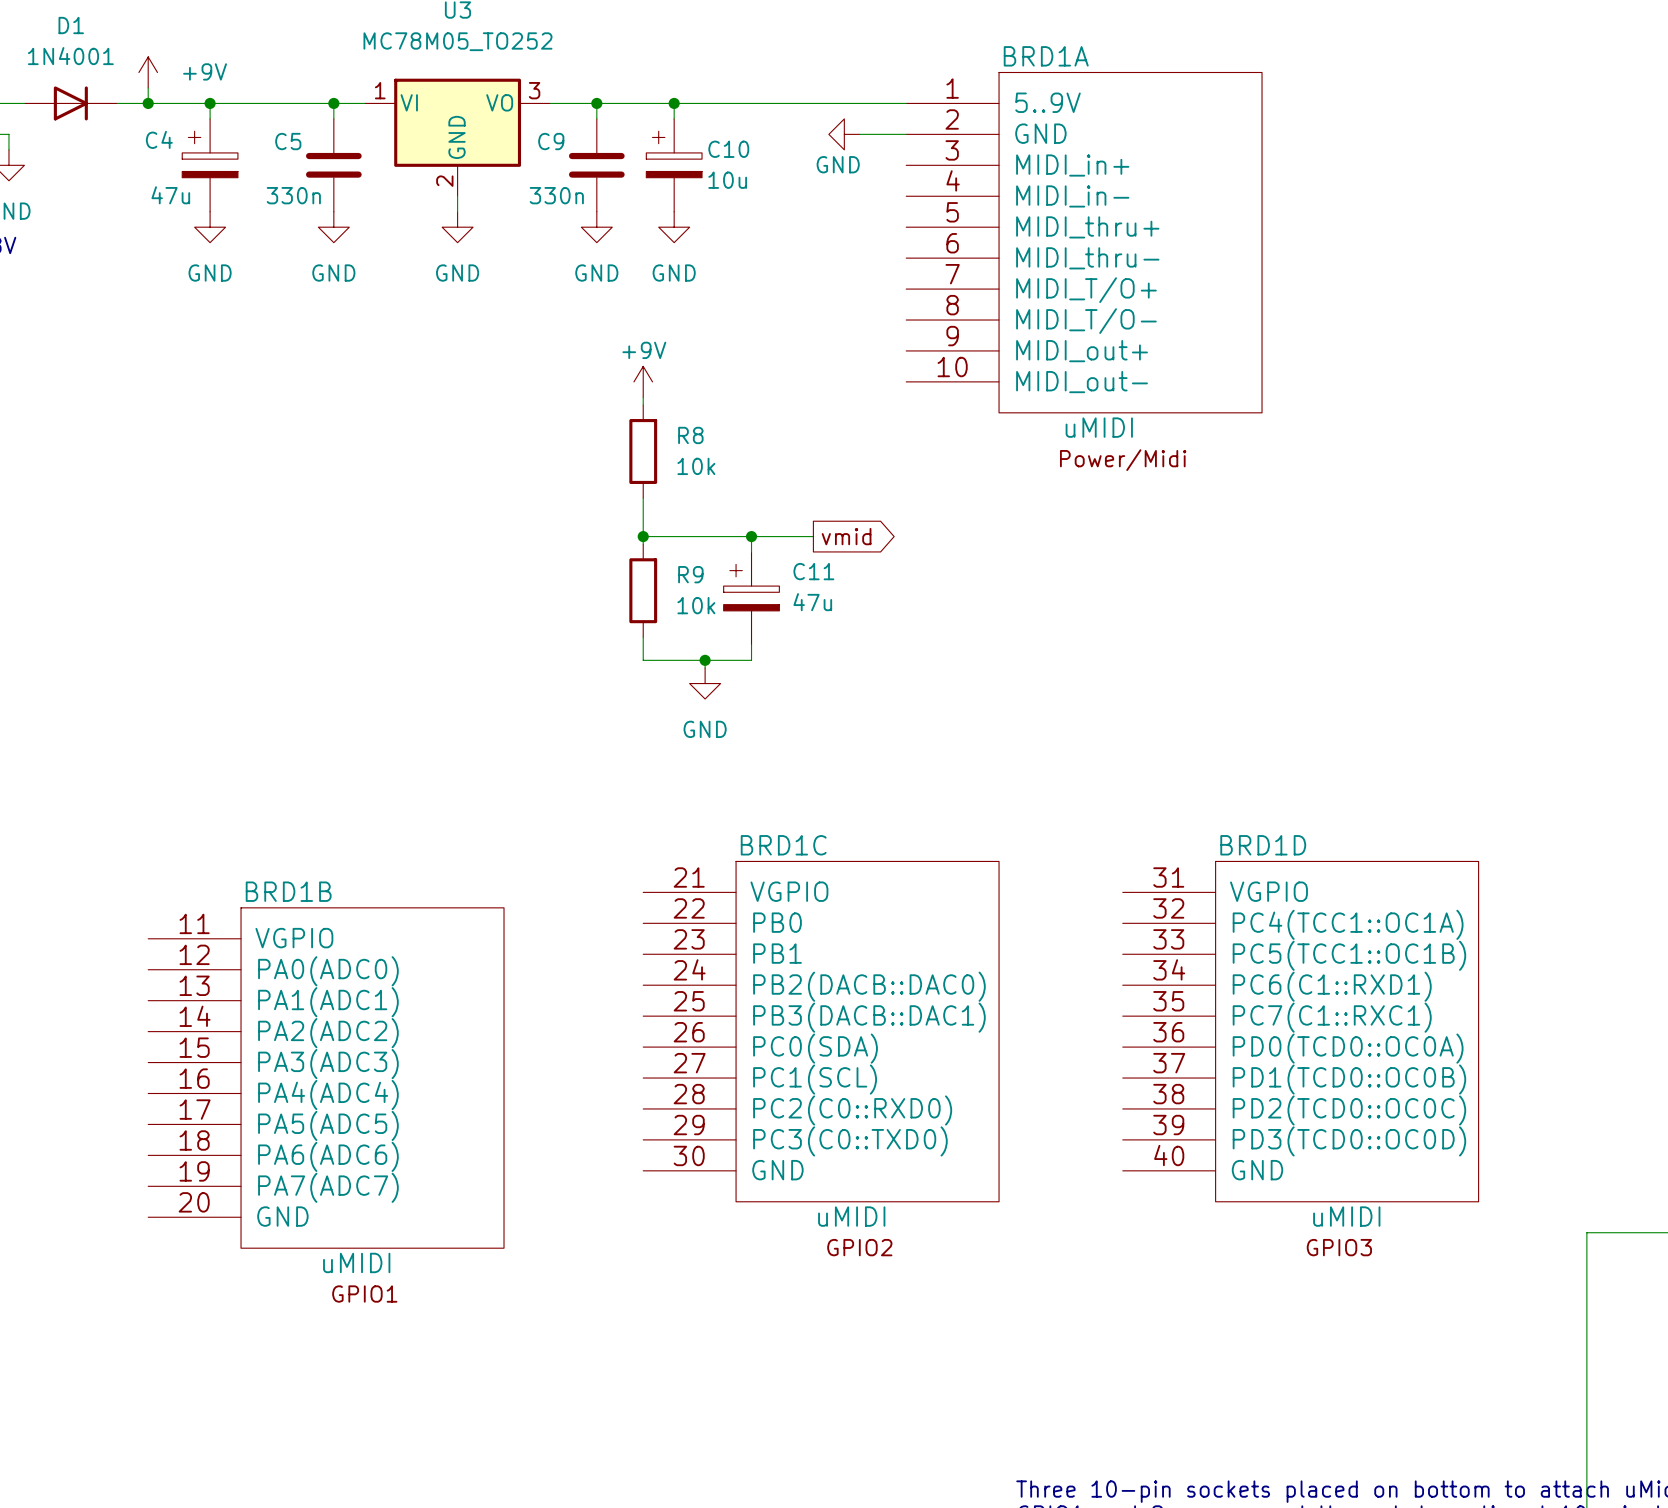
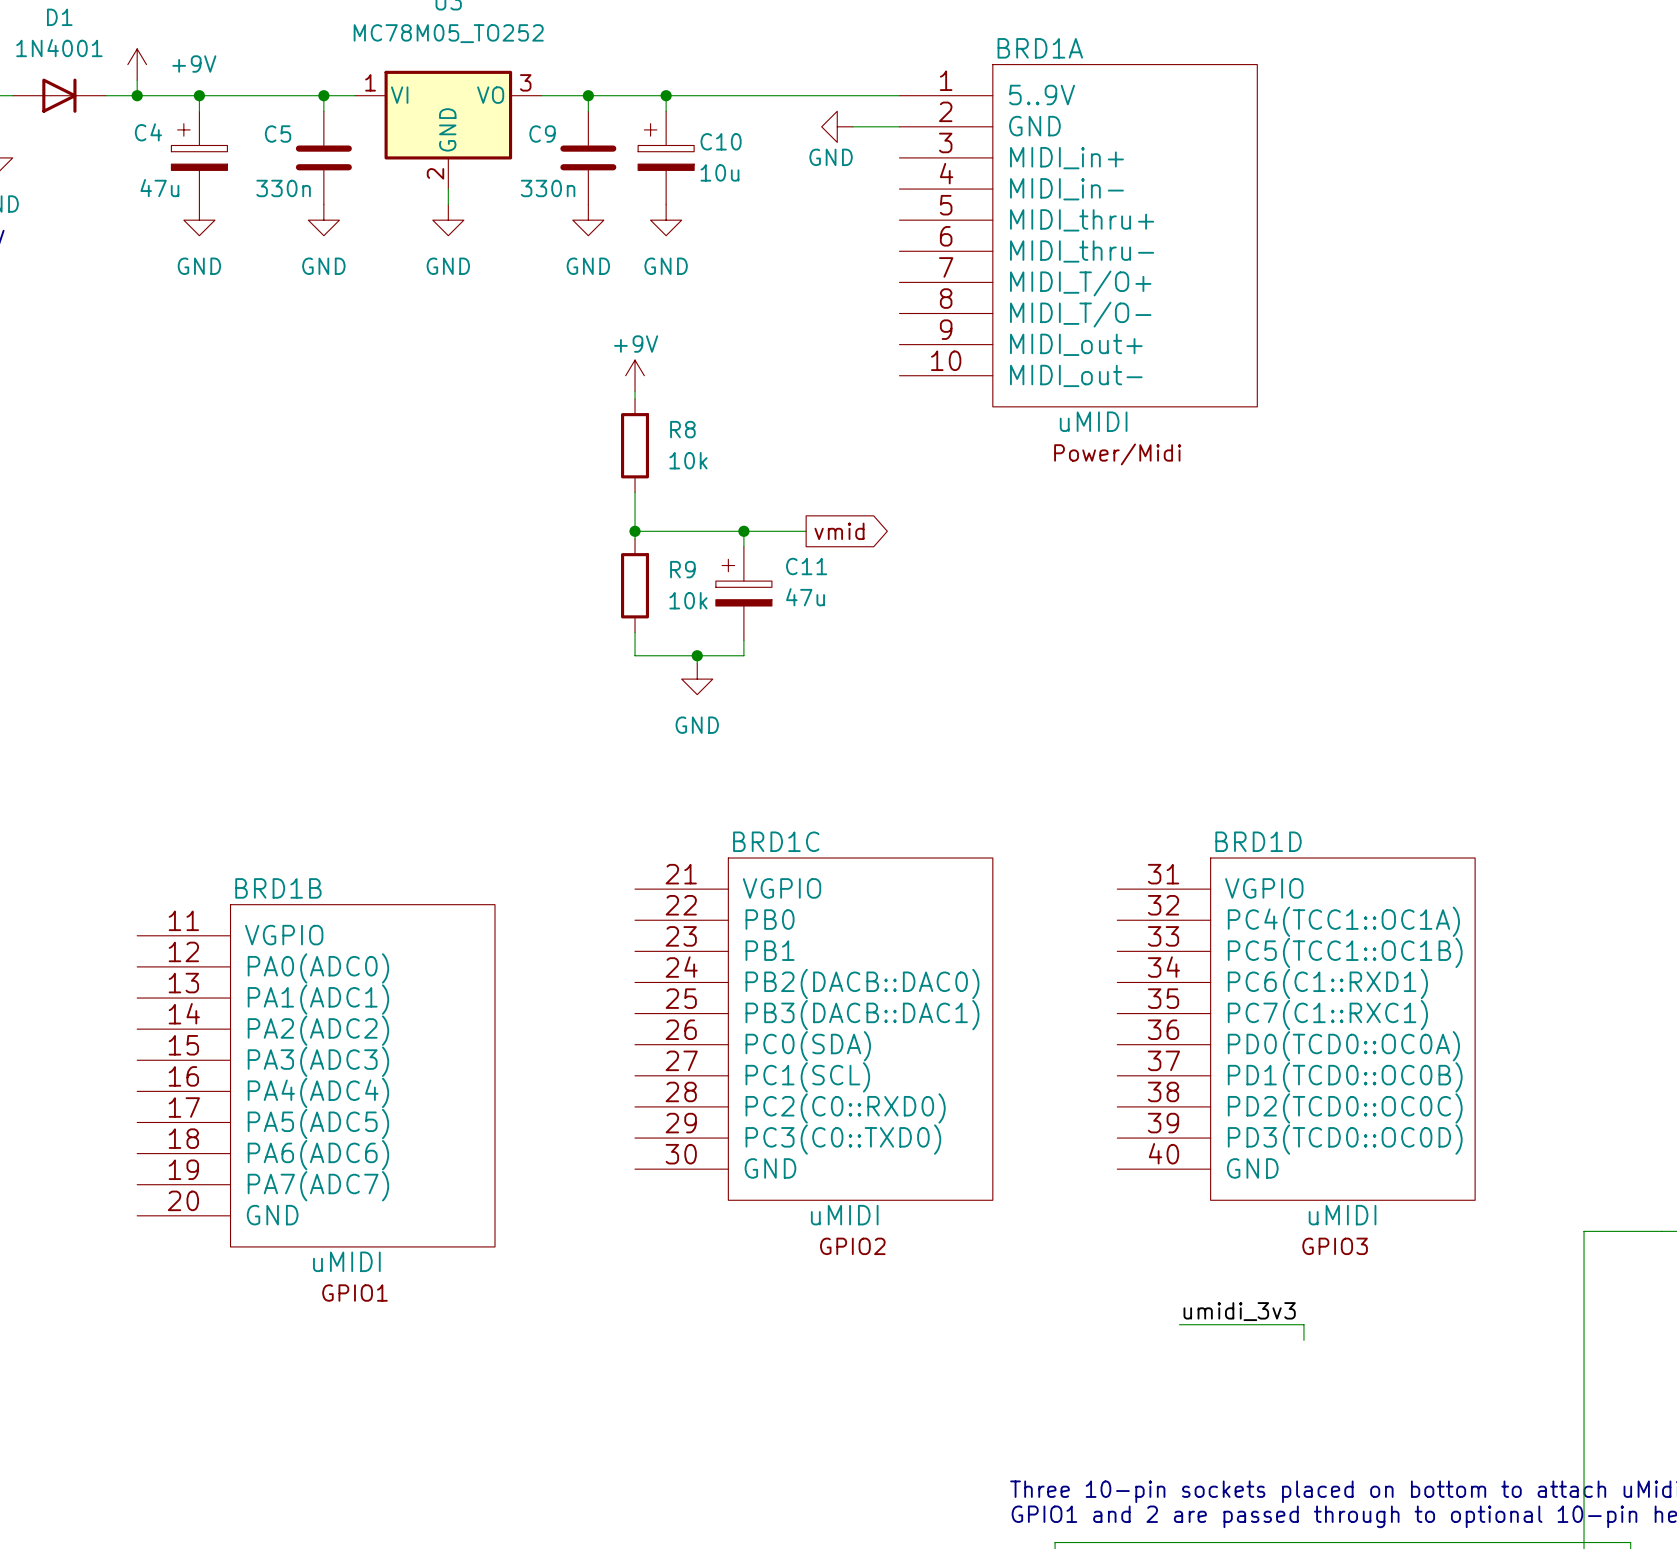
label: none -> umidi_3v3 (1239, 1311)
wire: none -> (1179, 1324) (1303, 1324) (1303, 1340)

